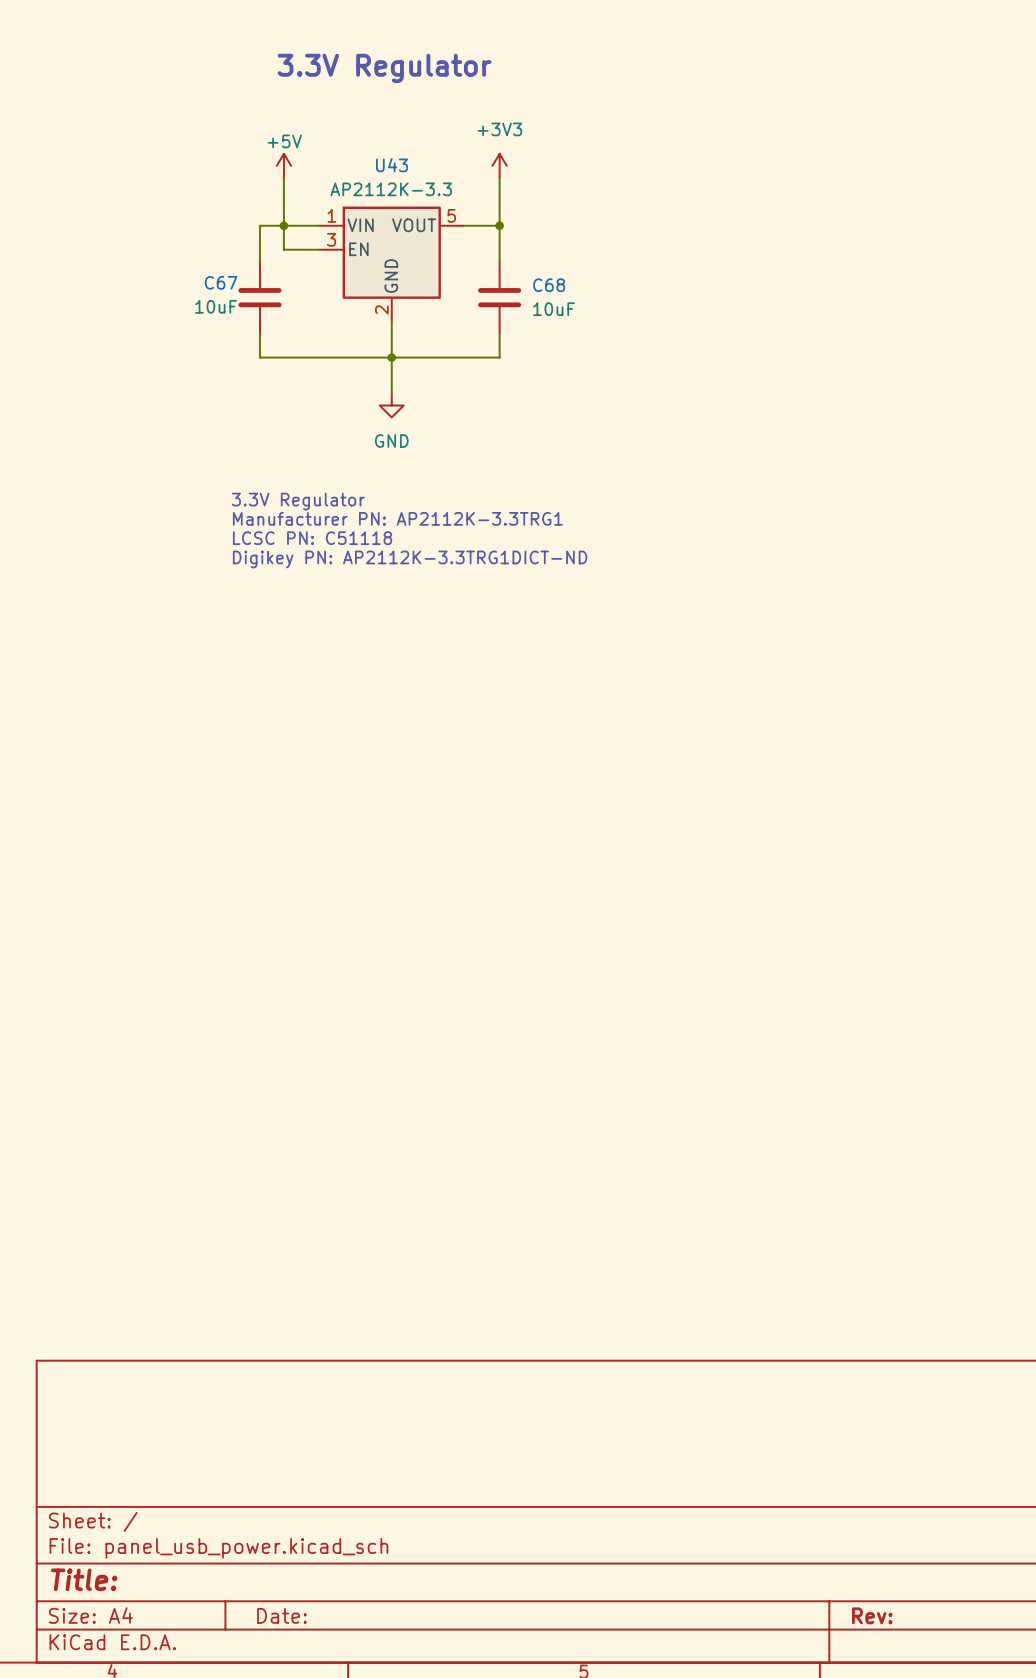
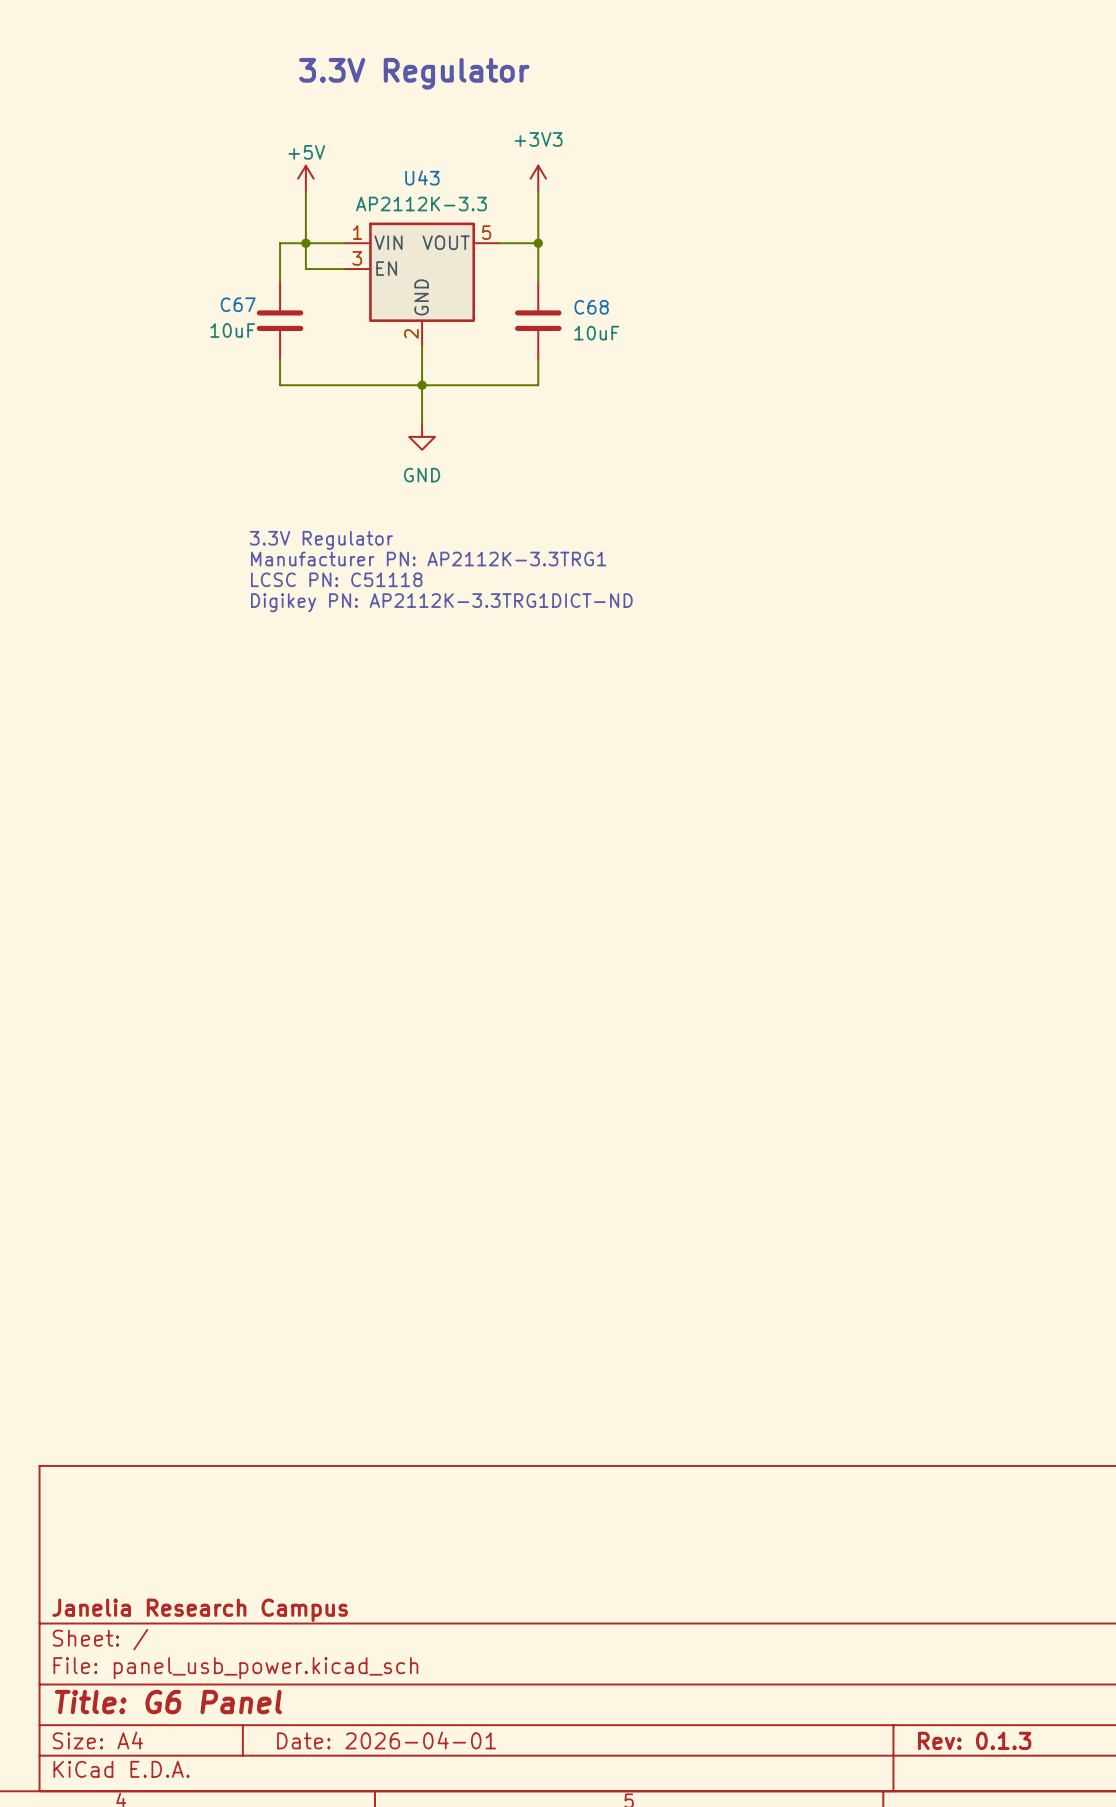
title block: none -> Janelia Research Campus (200, 1610)
title block: Title: (84, 1579) -> Title: G6 Panel (168, 1702)
title block: Date: (281, 1615) -> Date: 2026-04-01 (386, 1740)
title block: Rev: (872, 1615) -> Rev: 0.1.3 (974, 1740)

